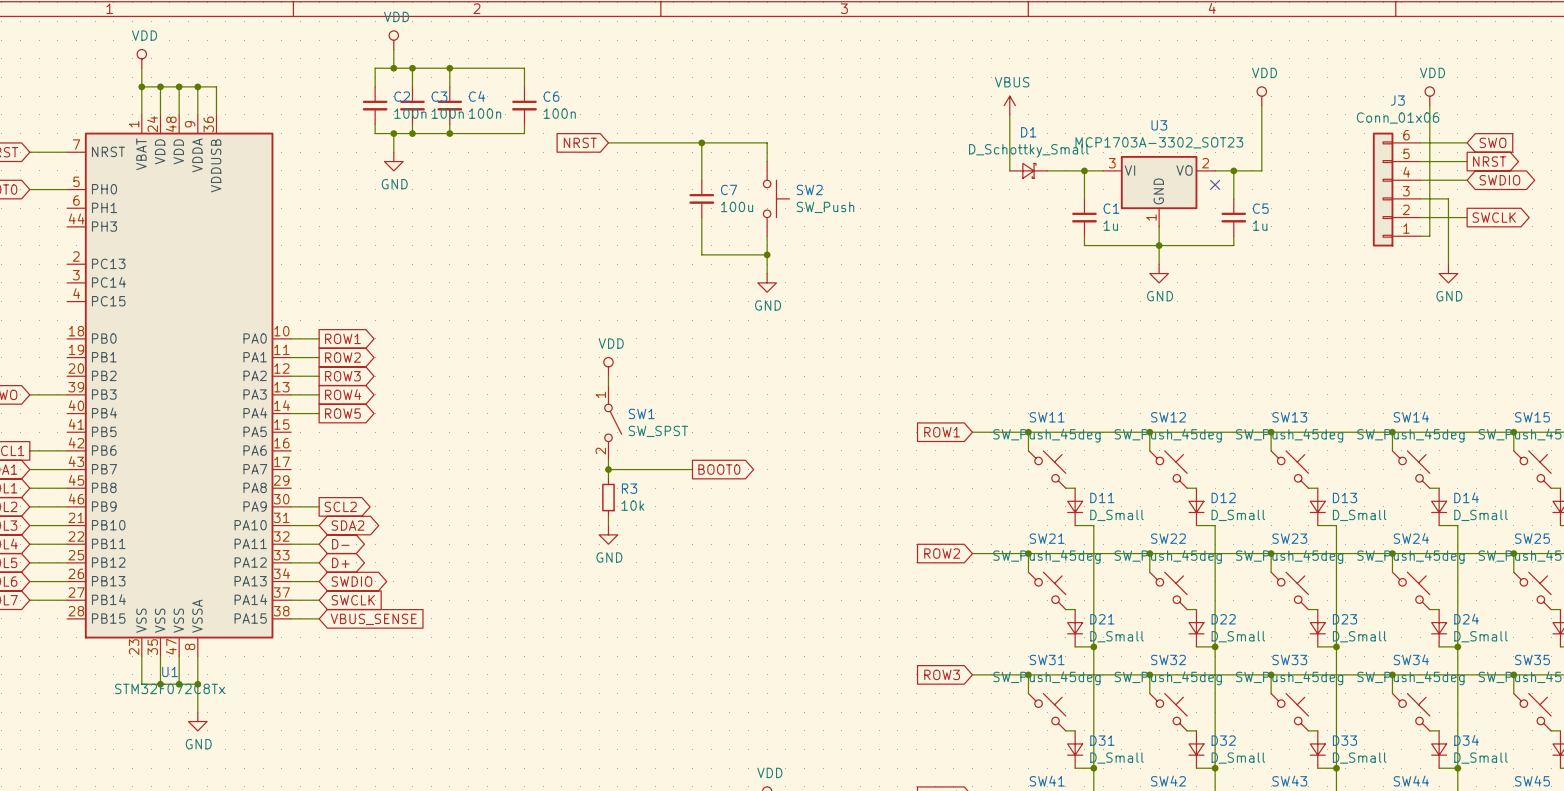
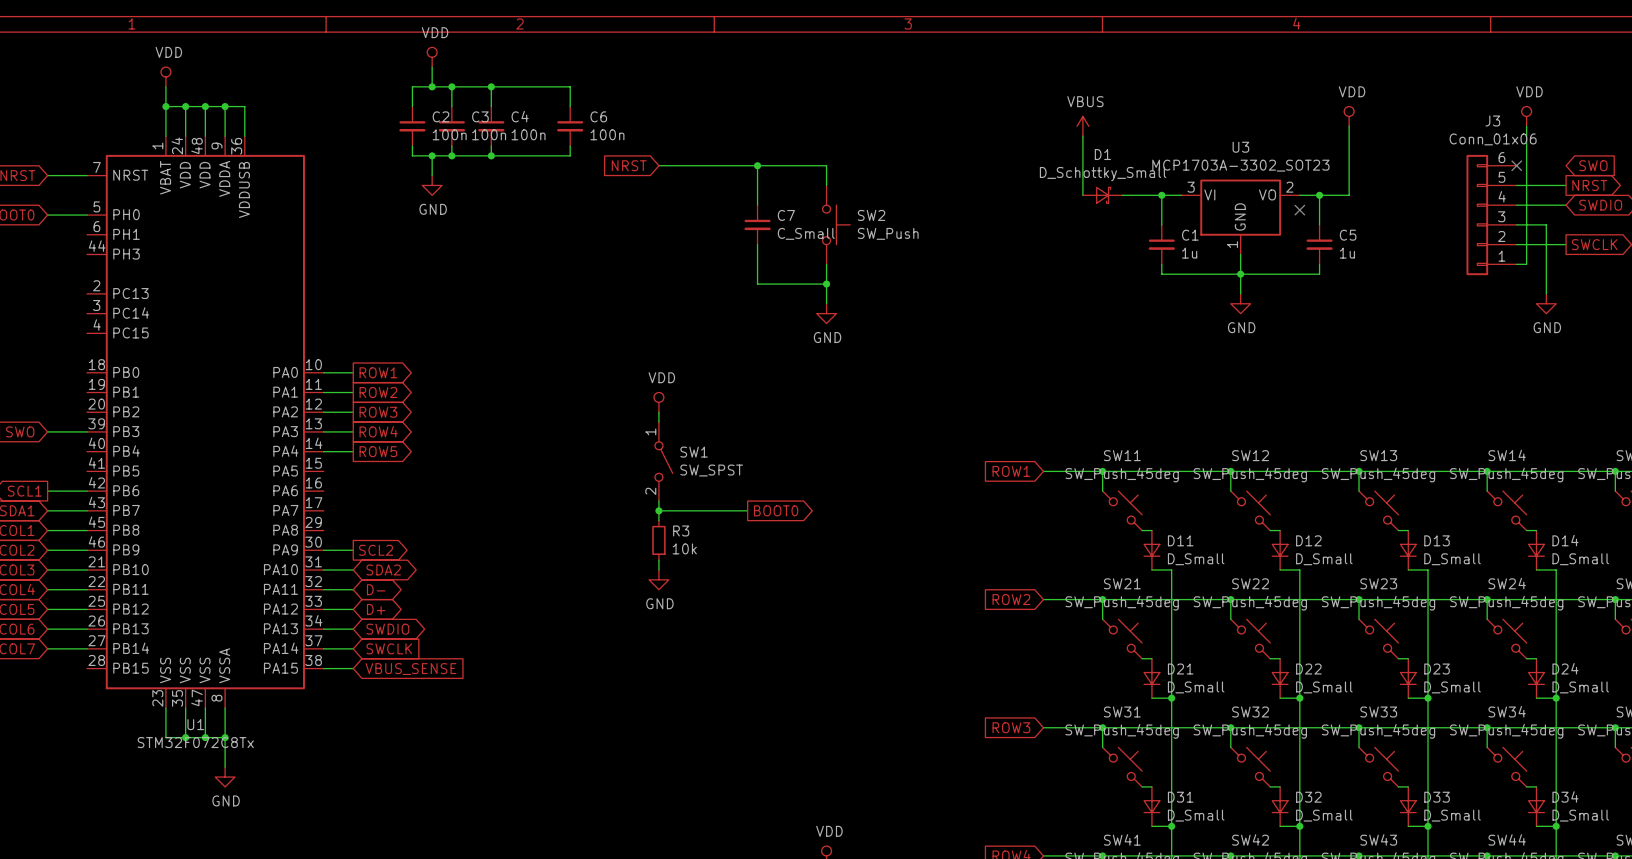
wire: (1420, 142) (1467, 142) -> none
no-connect mark: none -> (1516, 165)
C7 value: 100u (737, 206) -> C_Small (806, 233)

